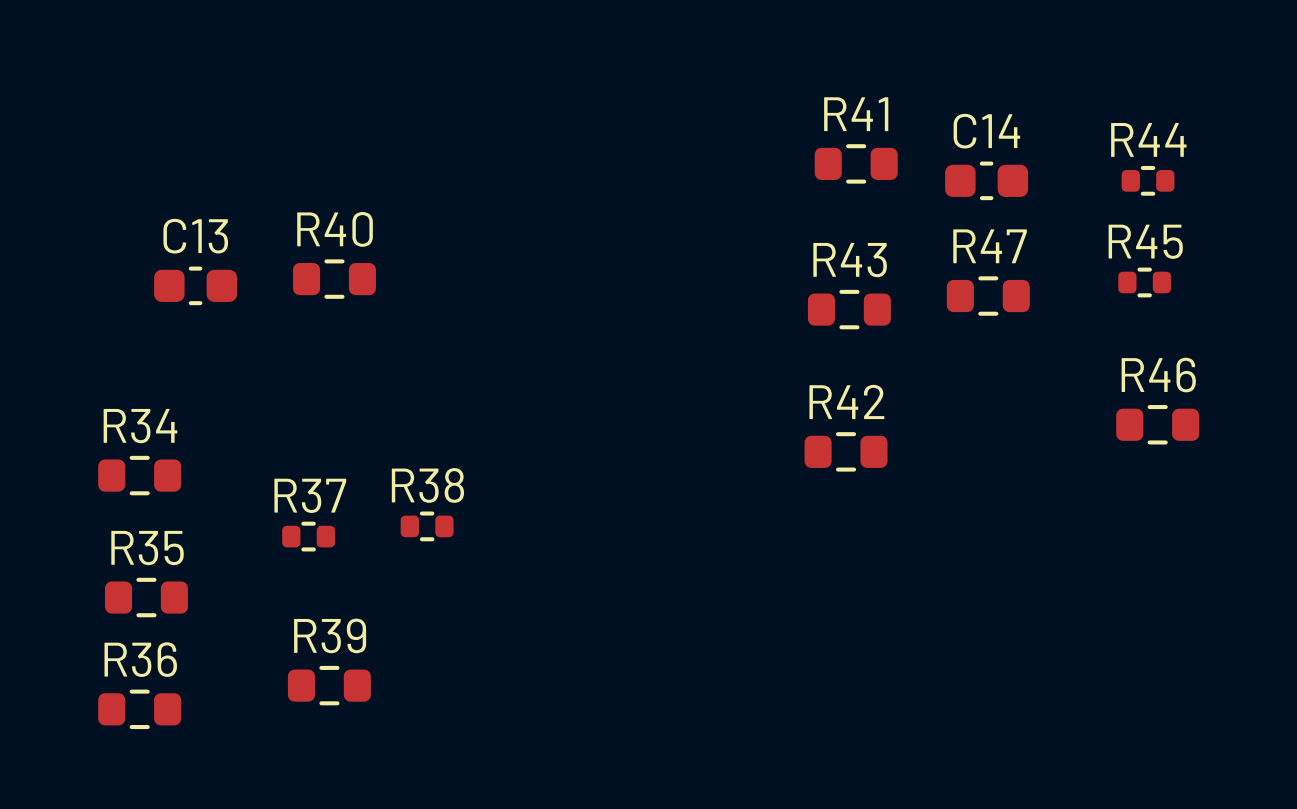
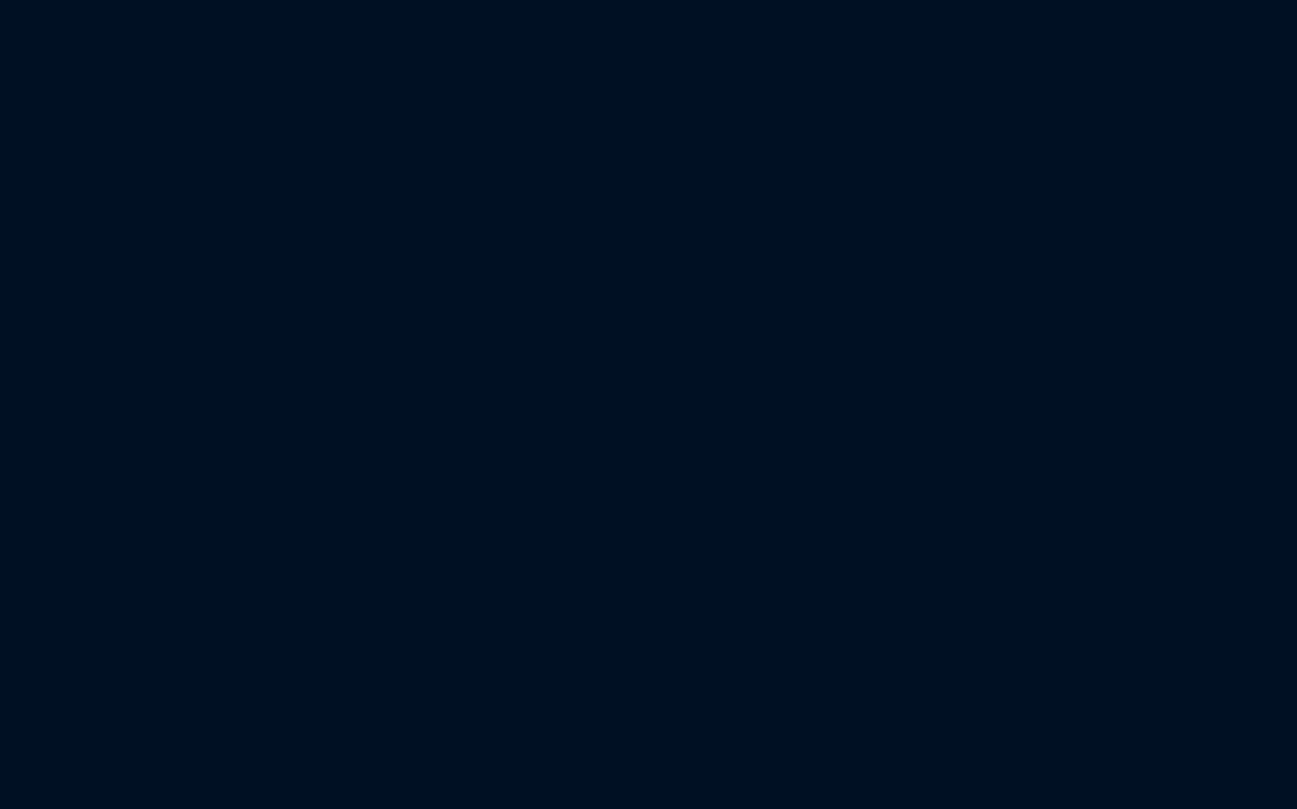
R41: (856, 163) -> none
C14: (986, 180) -> none
R44: (1148, 180) -> none
R40: (334, 279) -> none
R45: (1144, 282) -> none
C13: (195, 285) -> none
R47: (988, 296) -> none
R43: (849, 309) -> none
R46: (1157, 424) -> none
R42: (846, 451) -> none
R34: (139, 475) -> none
R38: (427, 526) -> none
R37: (308, 536) -> none
R35: (146, 597) -> none
R39: (329, 685) -> none
R36: (139, 709) -> none

